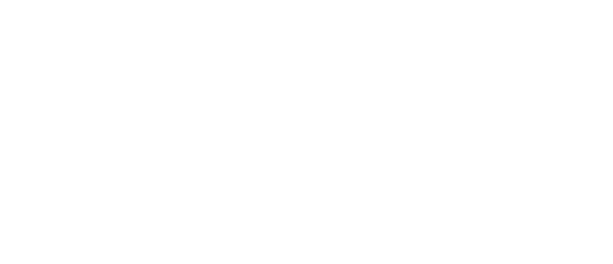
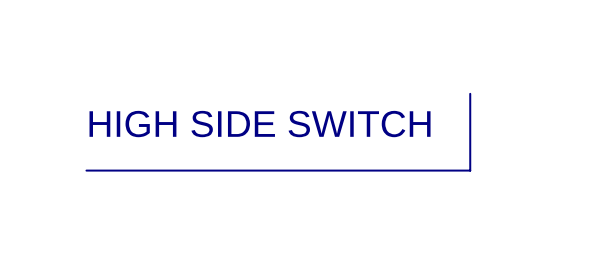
line: none -> (470, 93) (470, 170) (86, 170)
text: none -> HIGH SIDE SWITCH (260, 124)

